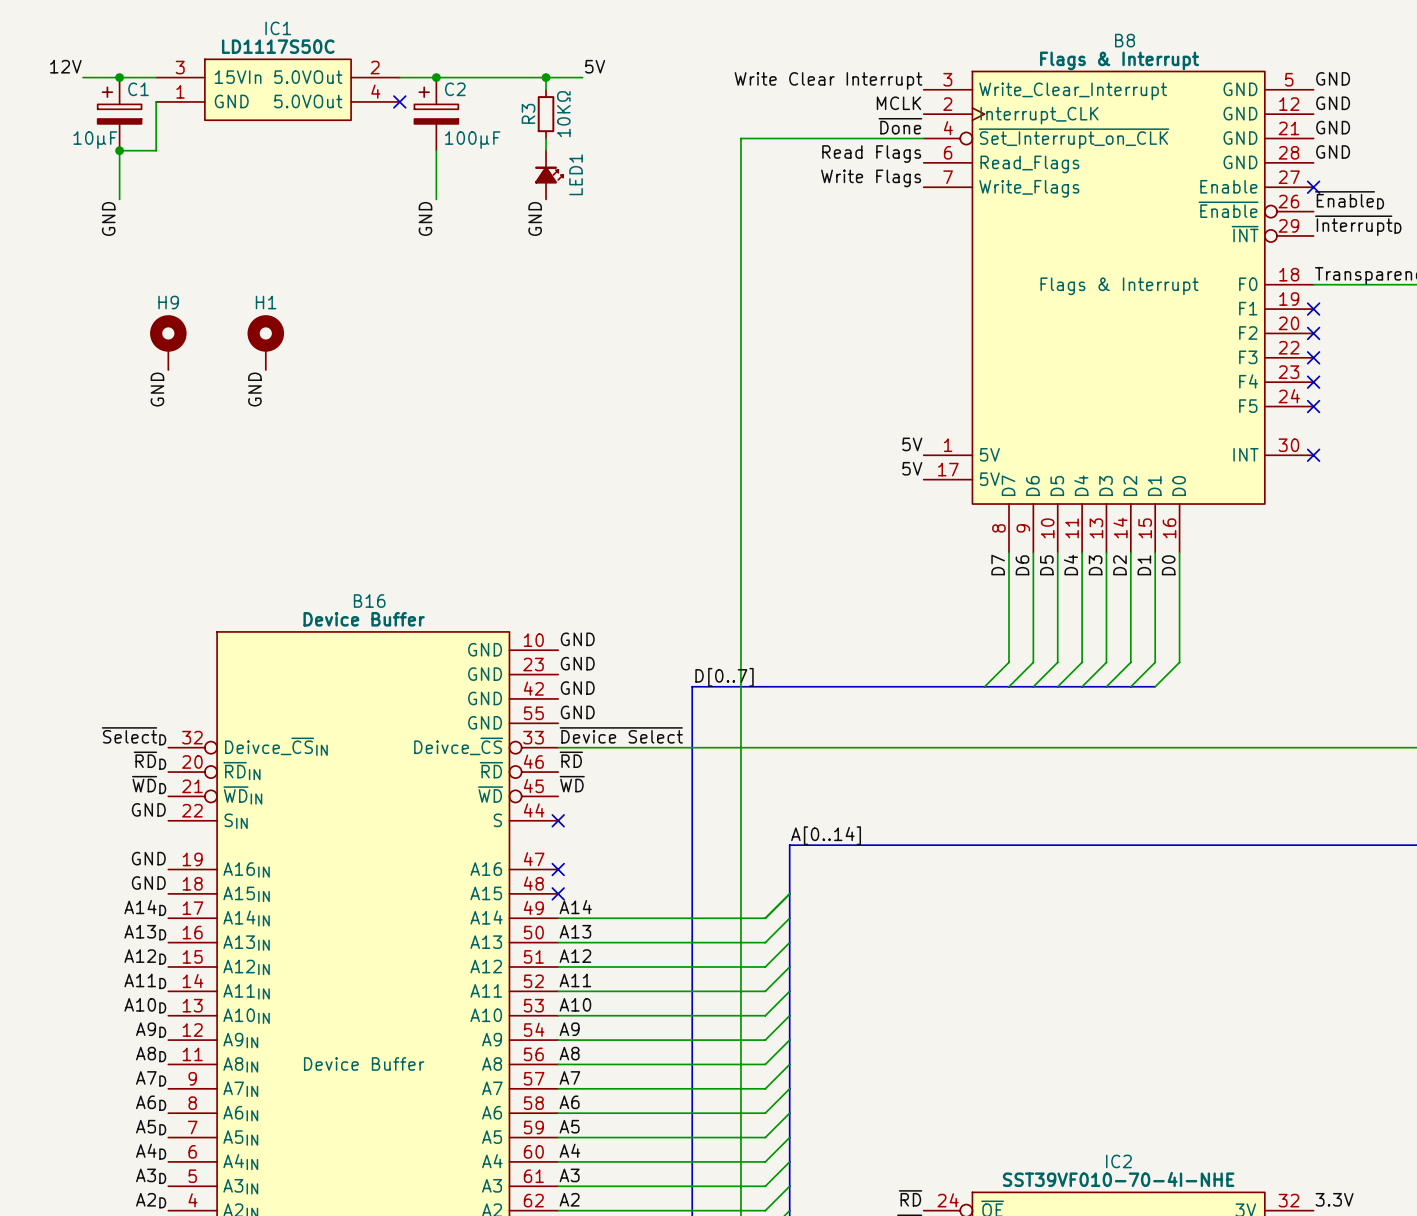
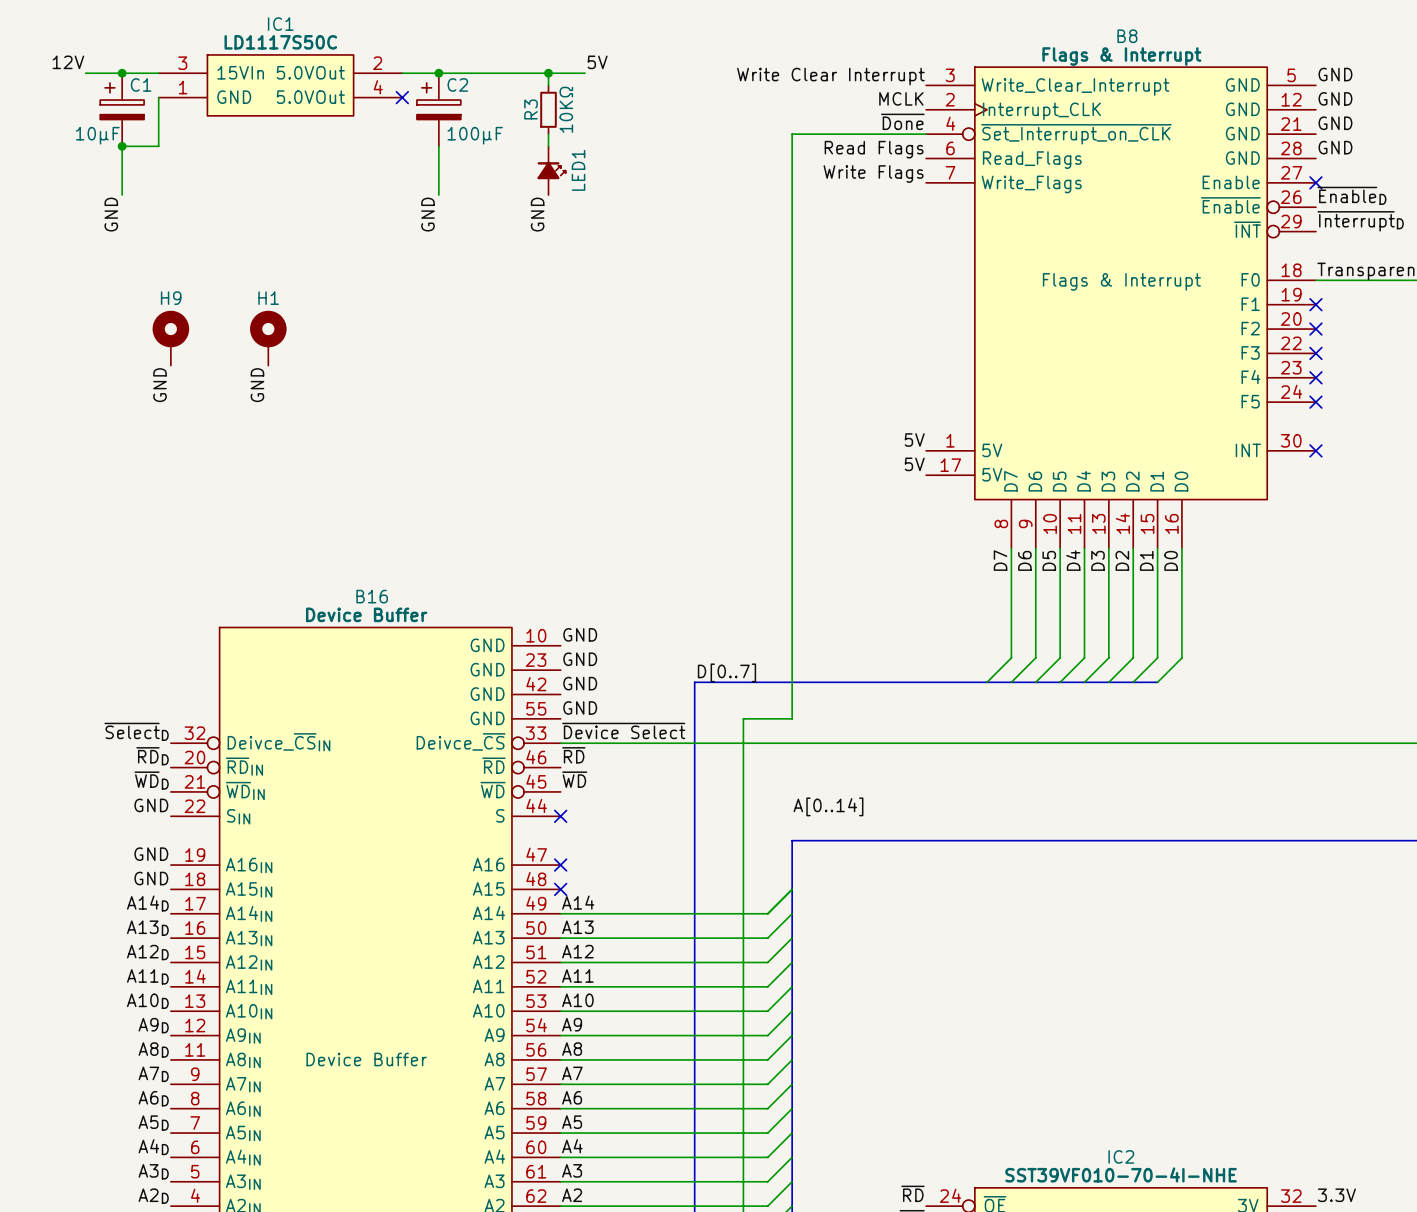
wire: (789, 138) (740, 138) (740, 723) -> (792, 134) (792, 718) (743, 718)
label position: A[0..14] (826, 835) -> A[0..14] (828, 806)

